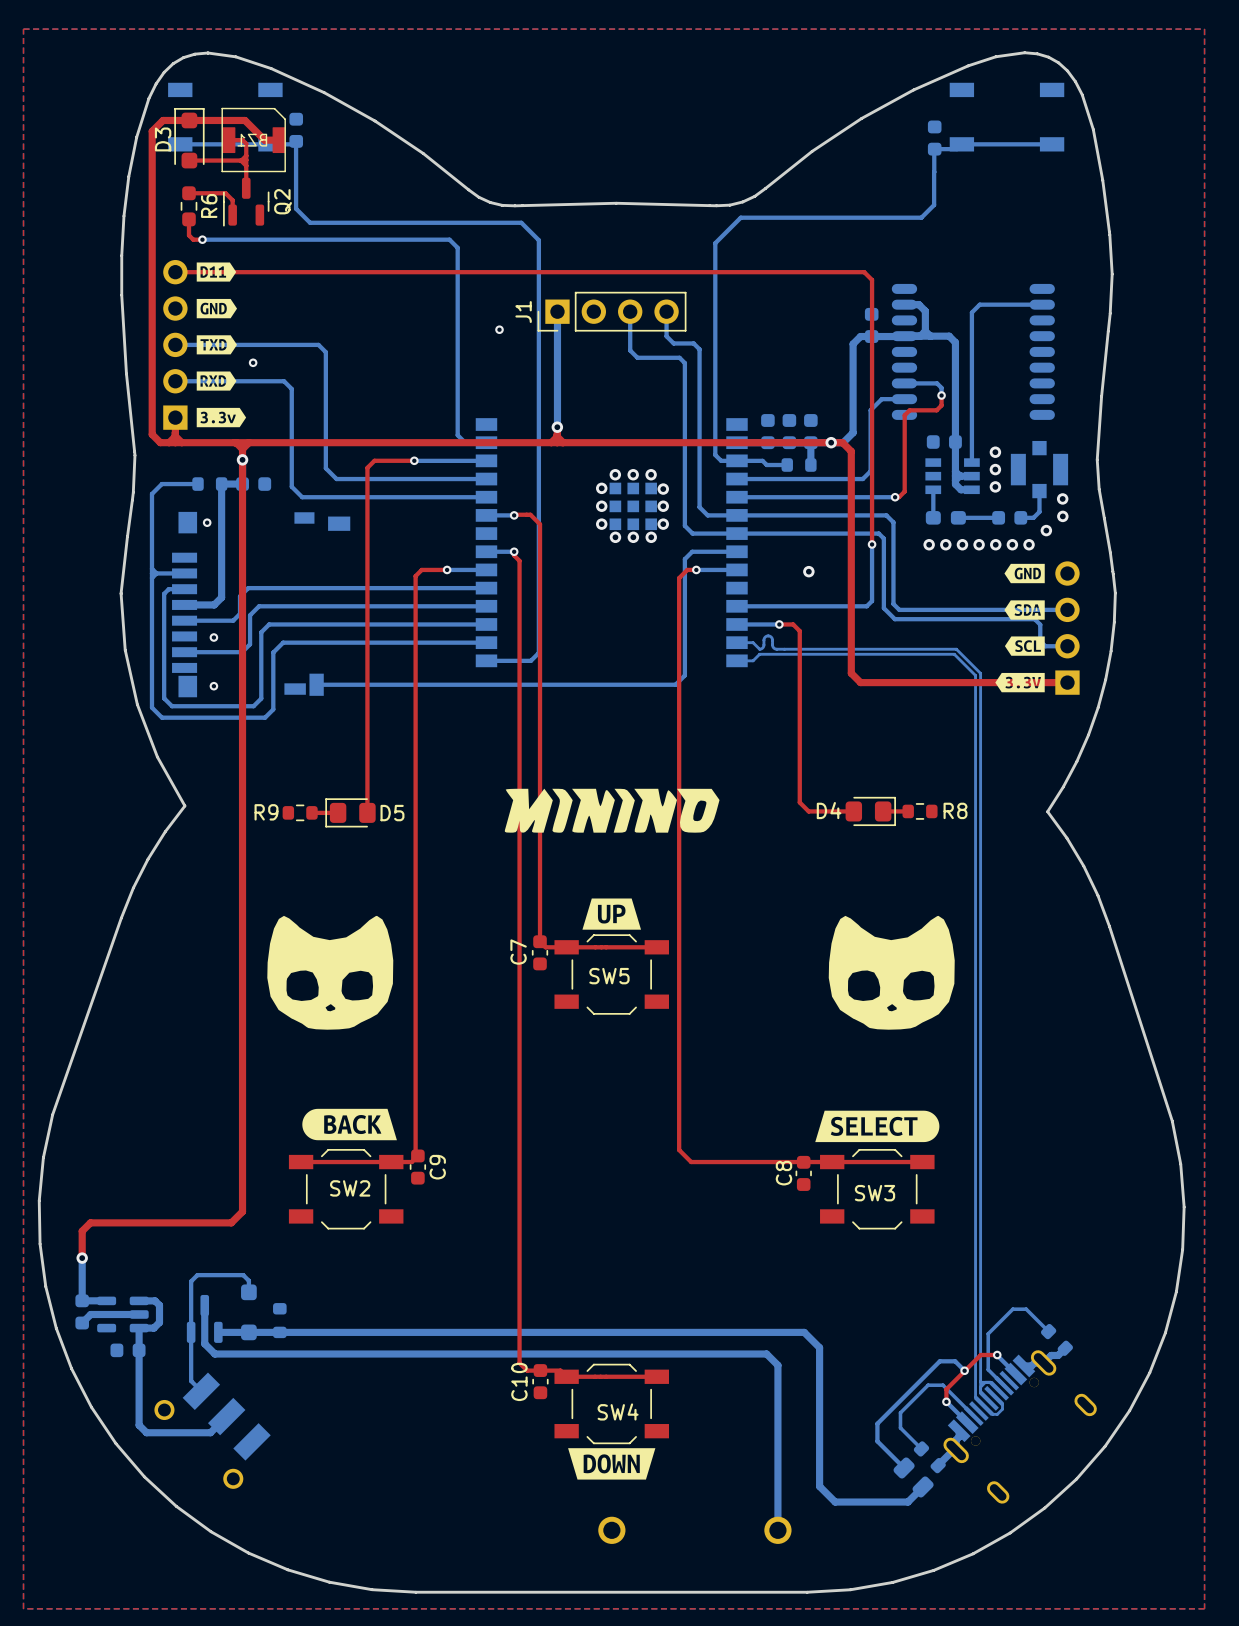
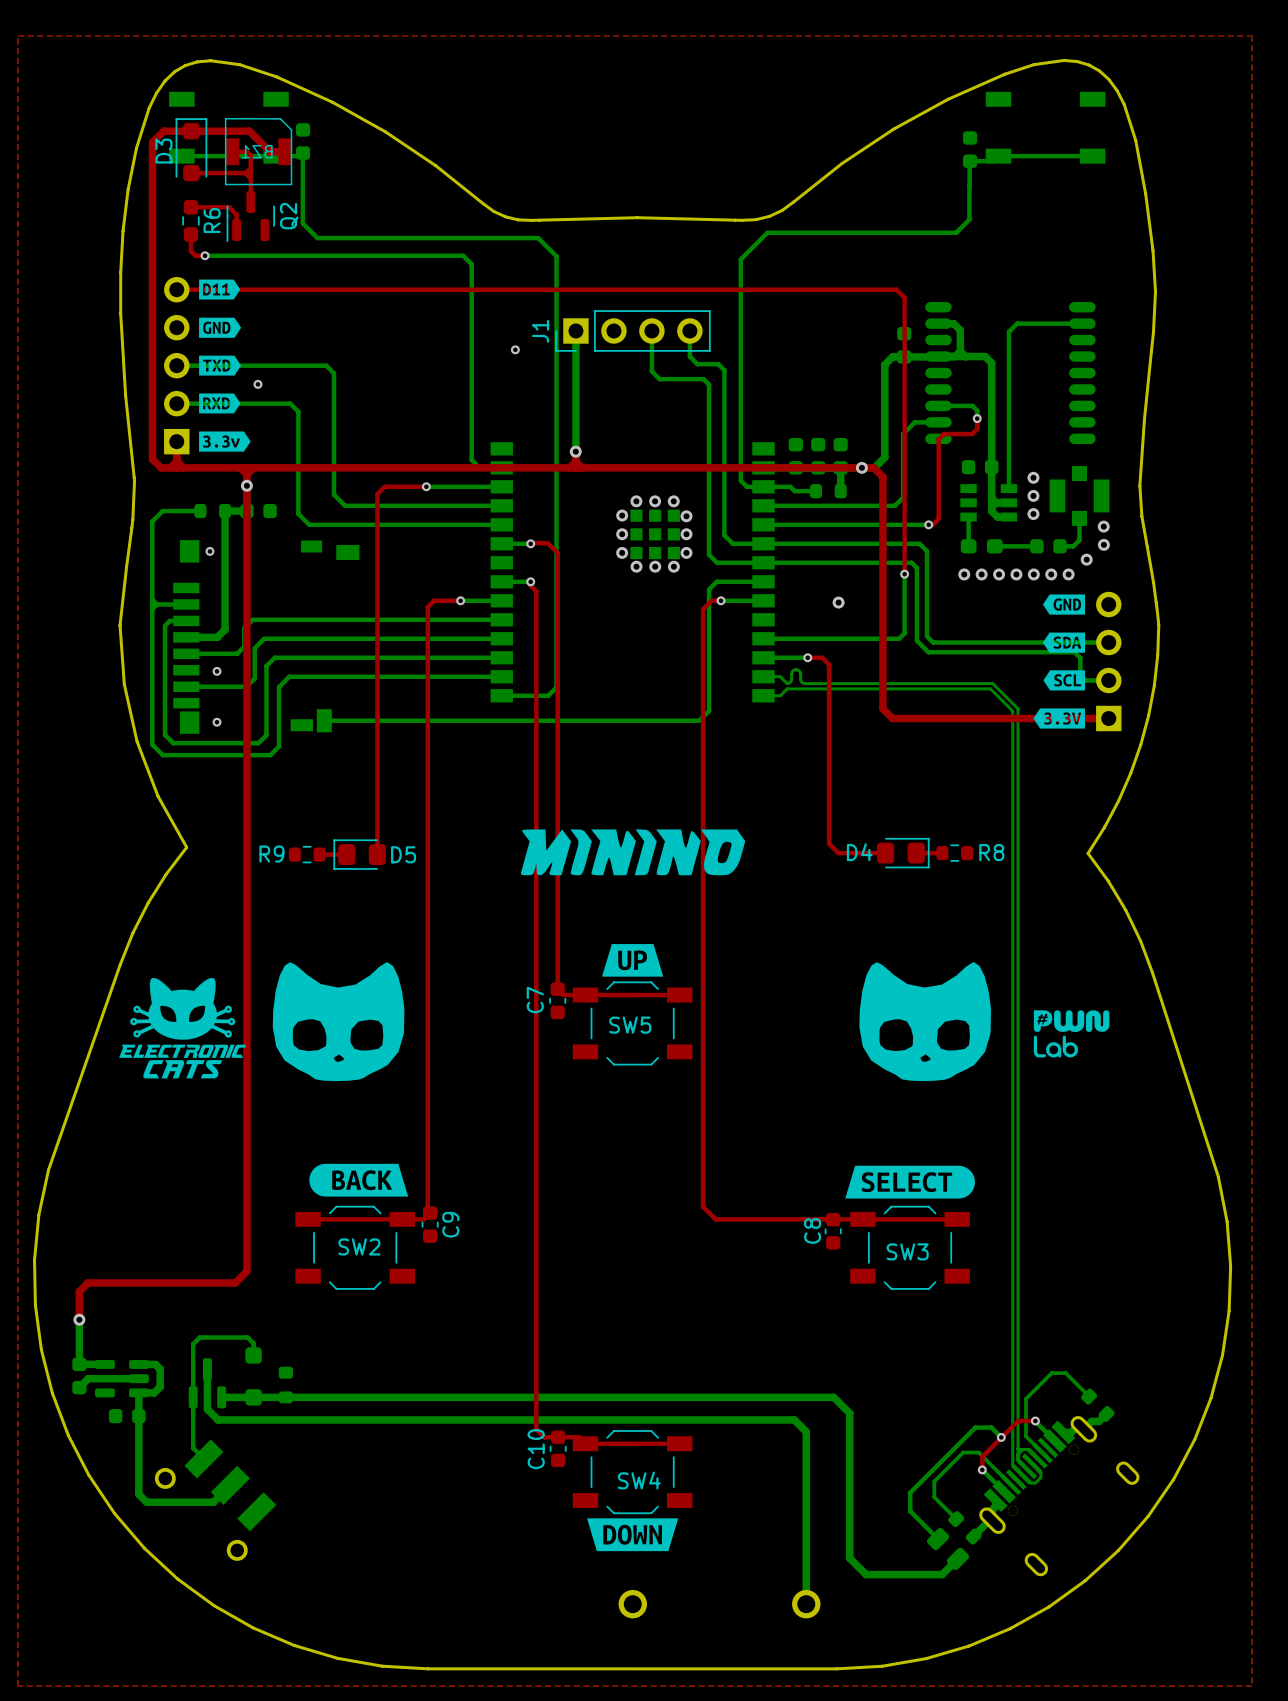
drawing: none -> [119, 977, 247, 1079]
drawing: none -> [1033, 1010, 1110, 1058]

